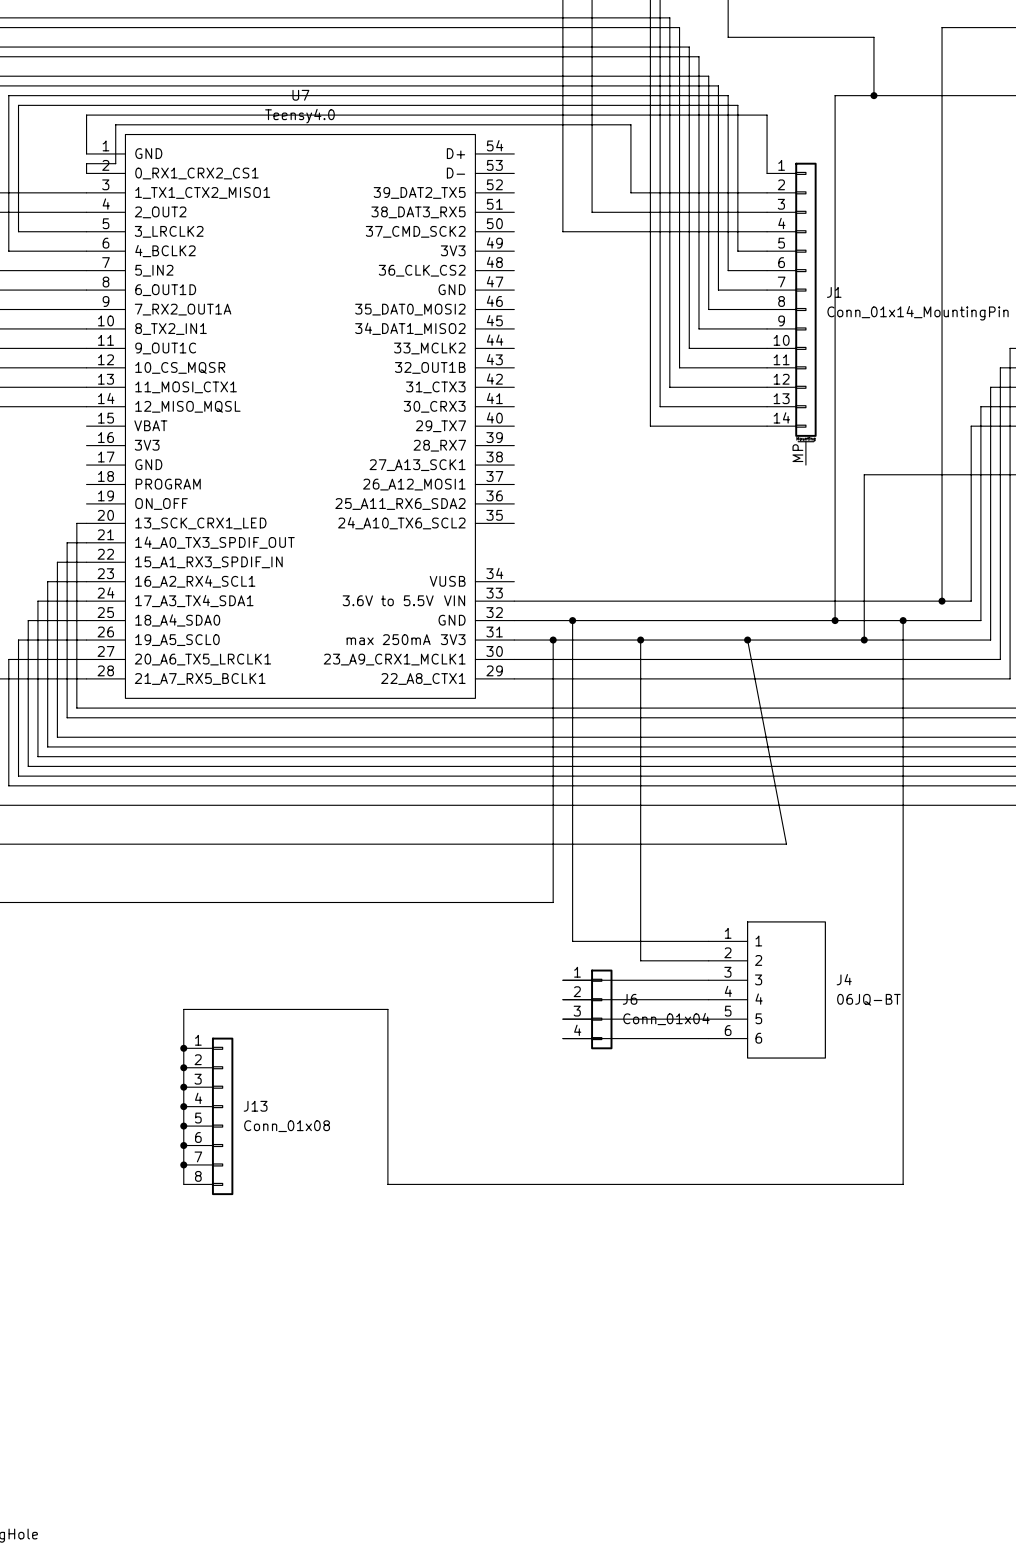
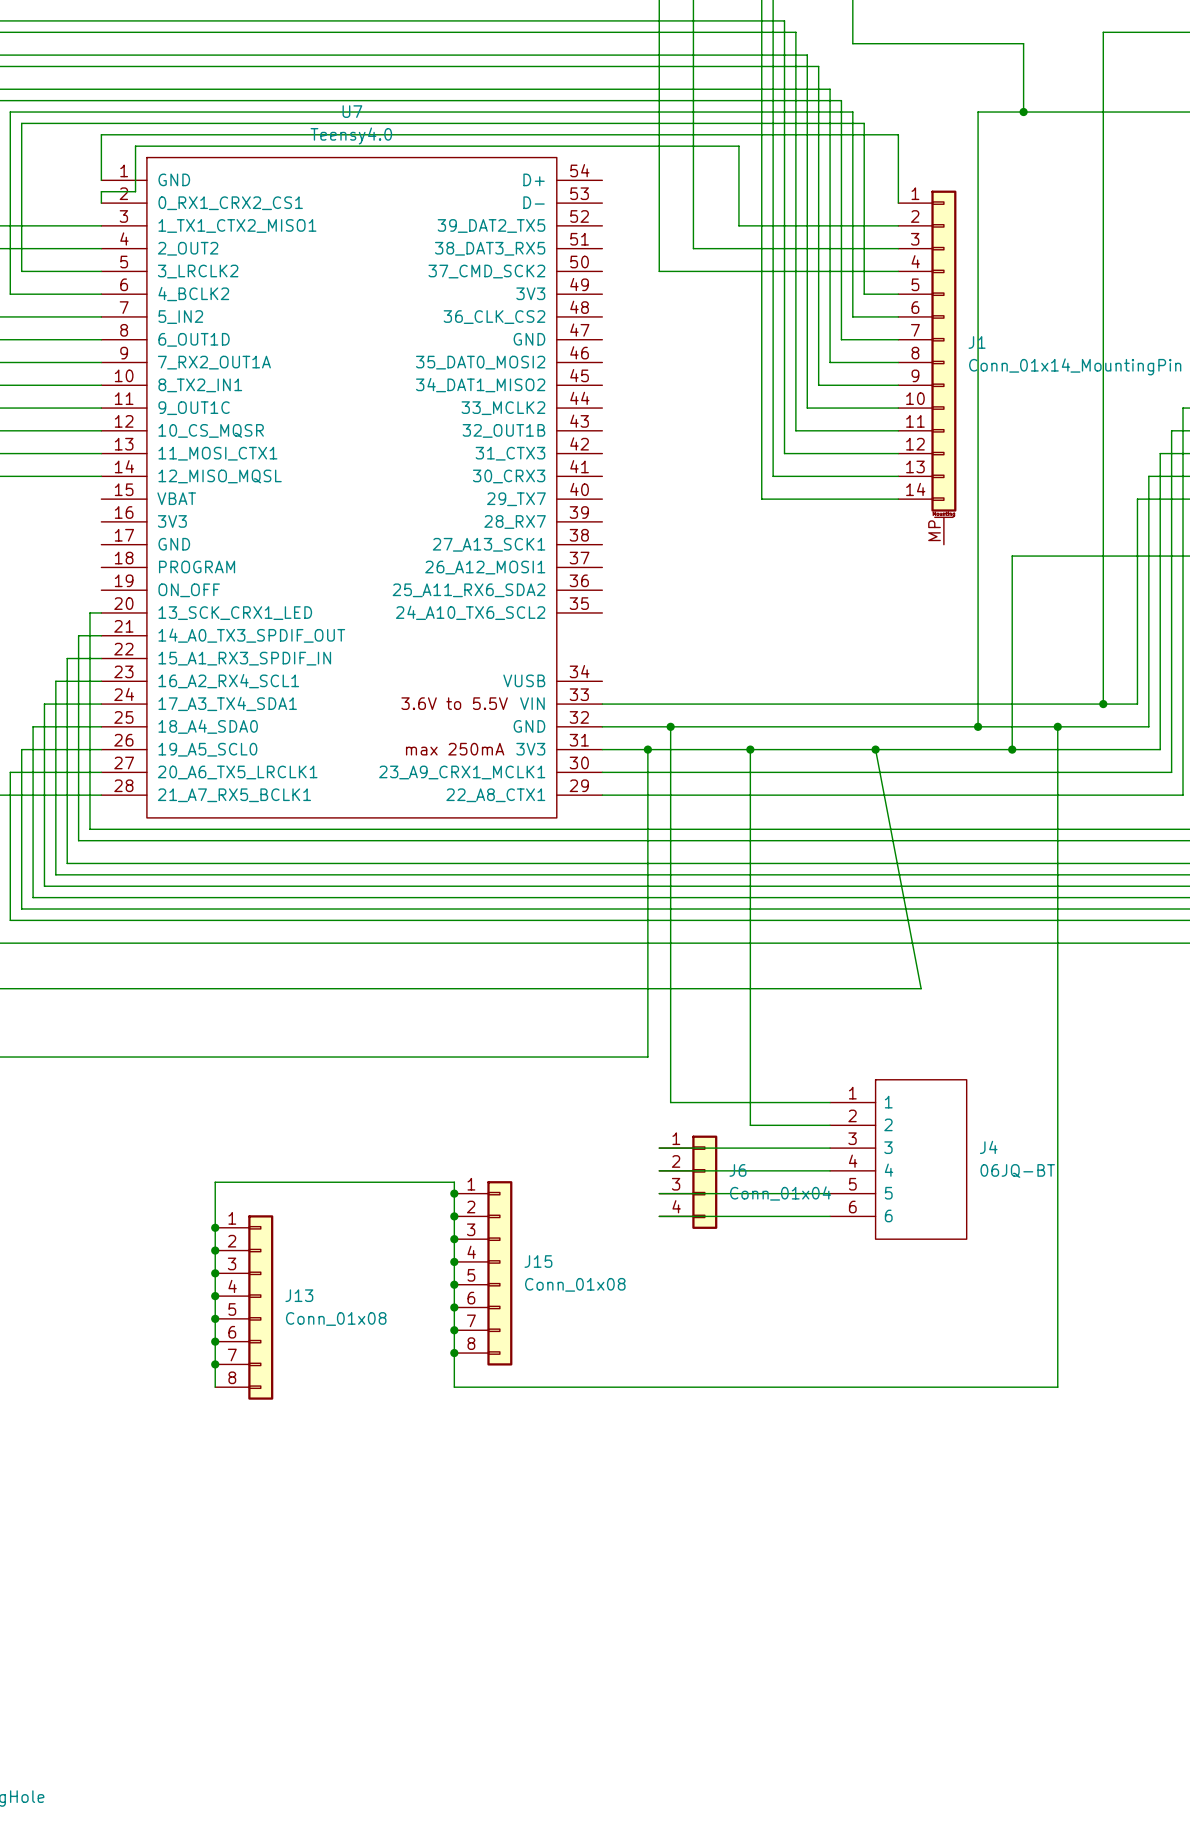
junction: none -> (454, 1193)
junction: none -> (454, 1216)
junction: none -> (454, 1239)
junction: none -> (454, 1261)
J15: none -> Conn_01x08 (483, 1273)
junction: none -> (454, 1284)
junction: none -> (454, 1307)
junction: none -> (454, 1330)
junction: none -> (454, 1353)

